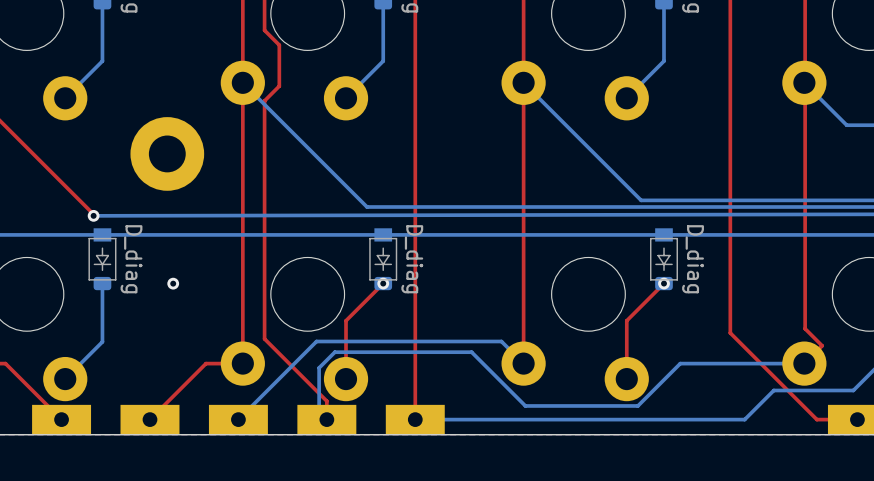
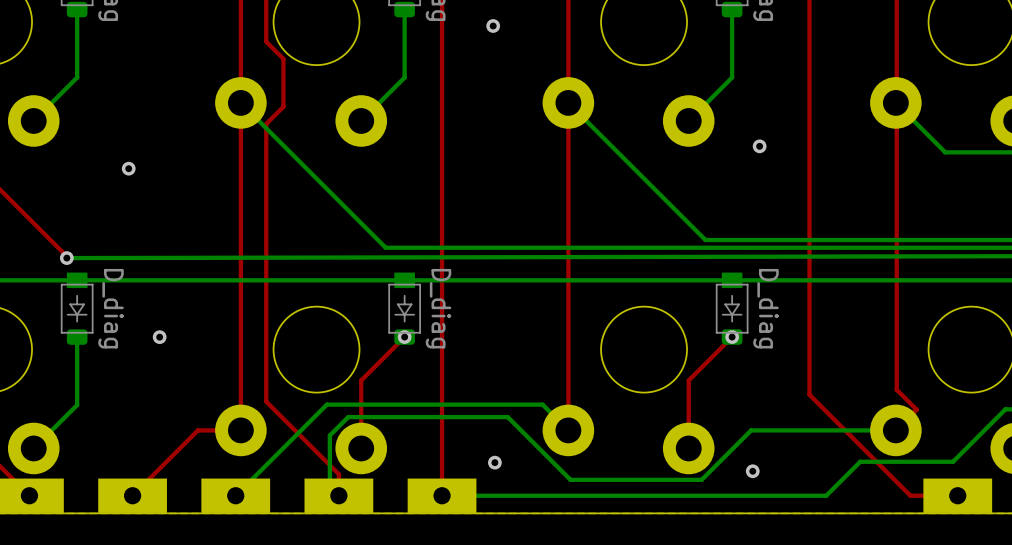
via: none -> (493, 26)
via: none -> (759, 146)
via: none -> (128, 168)
part: (167, 153) -> none
via: none -> (494, 462)
via: none -> (752, 471)

